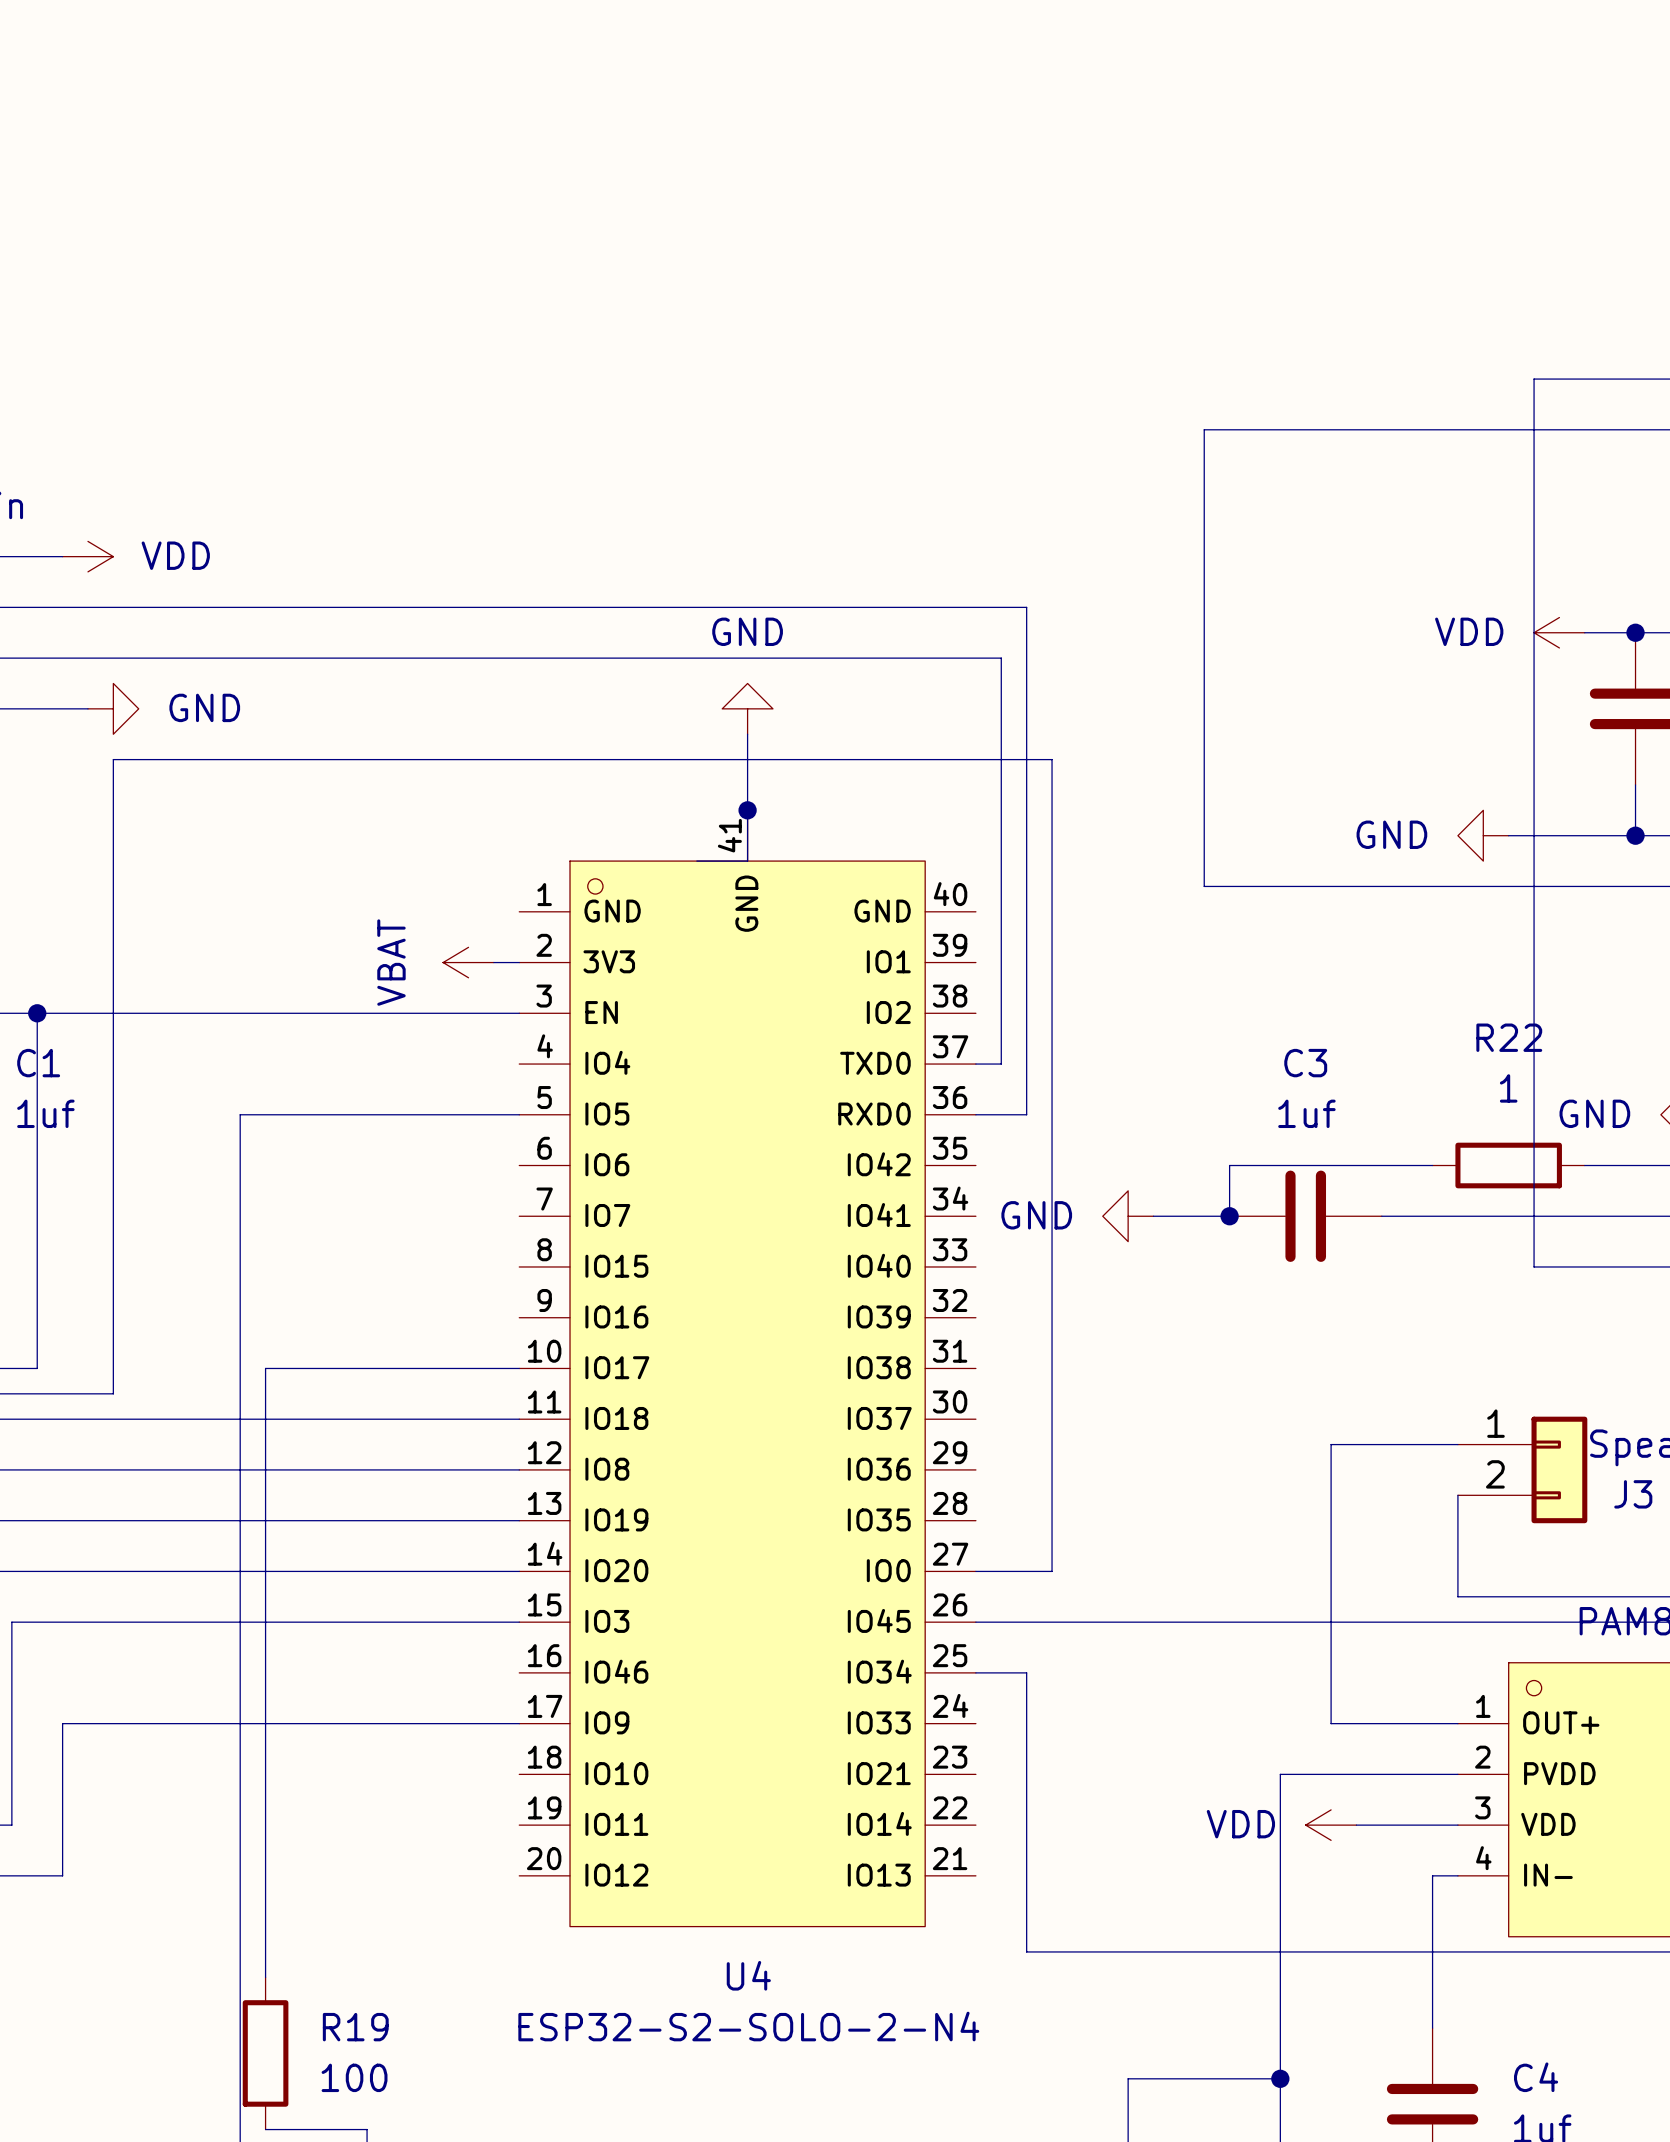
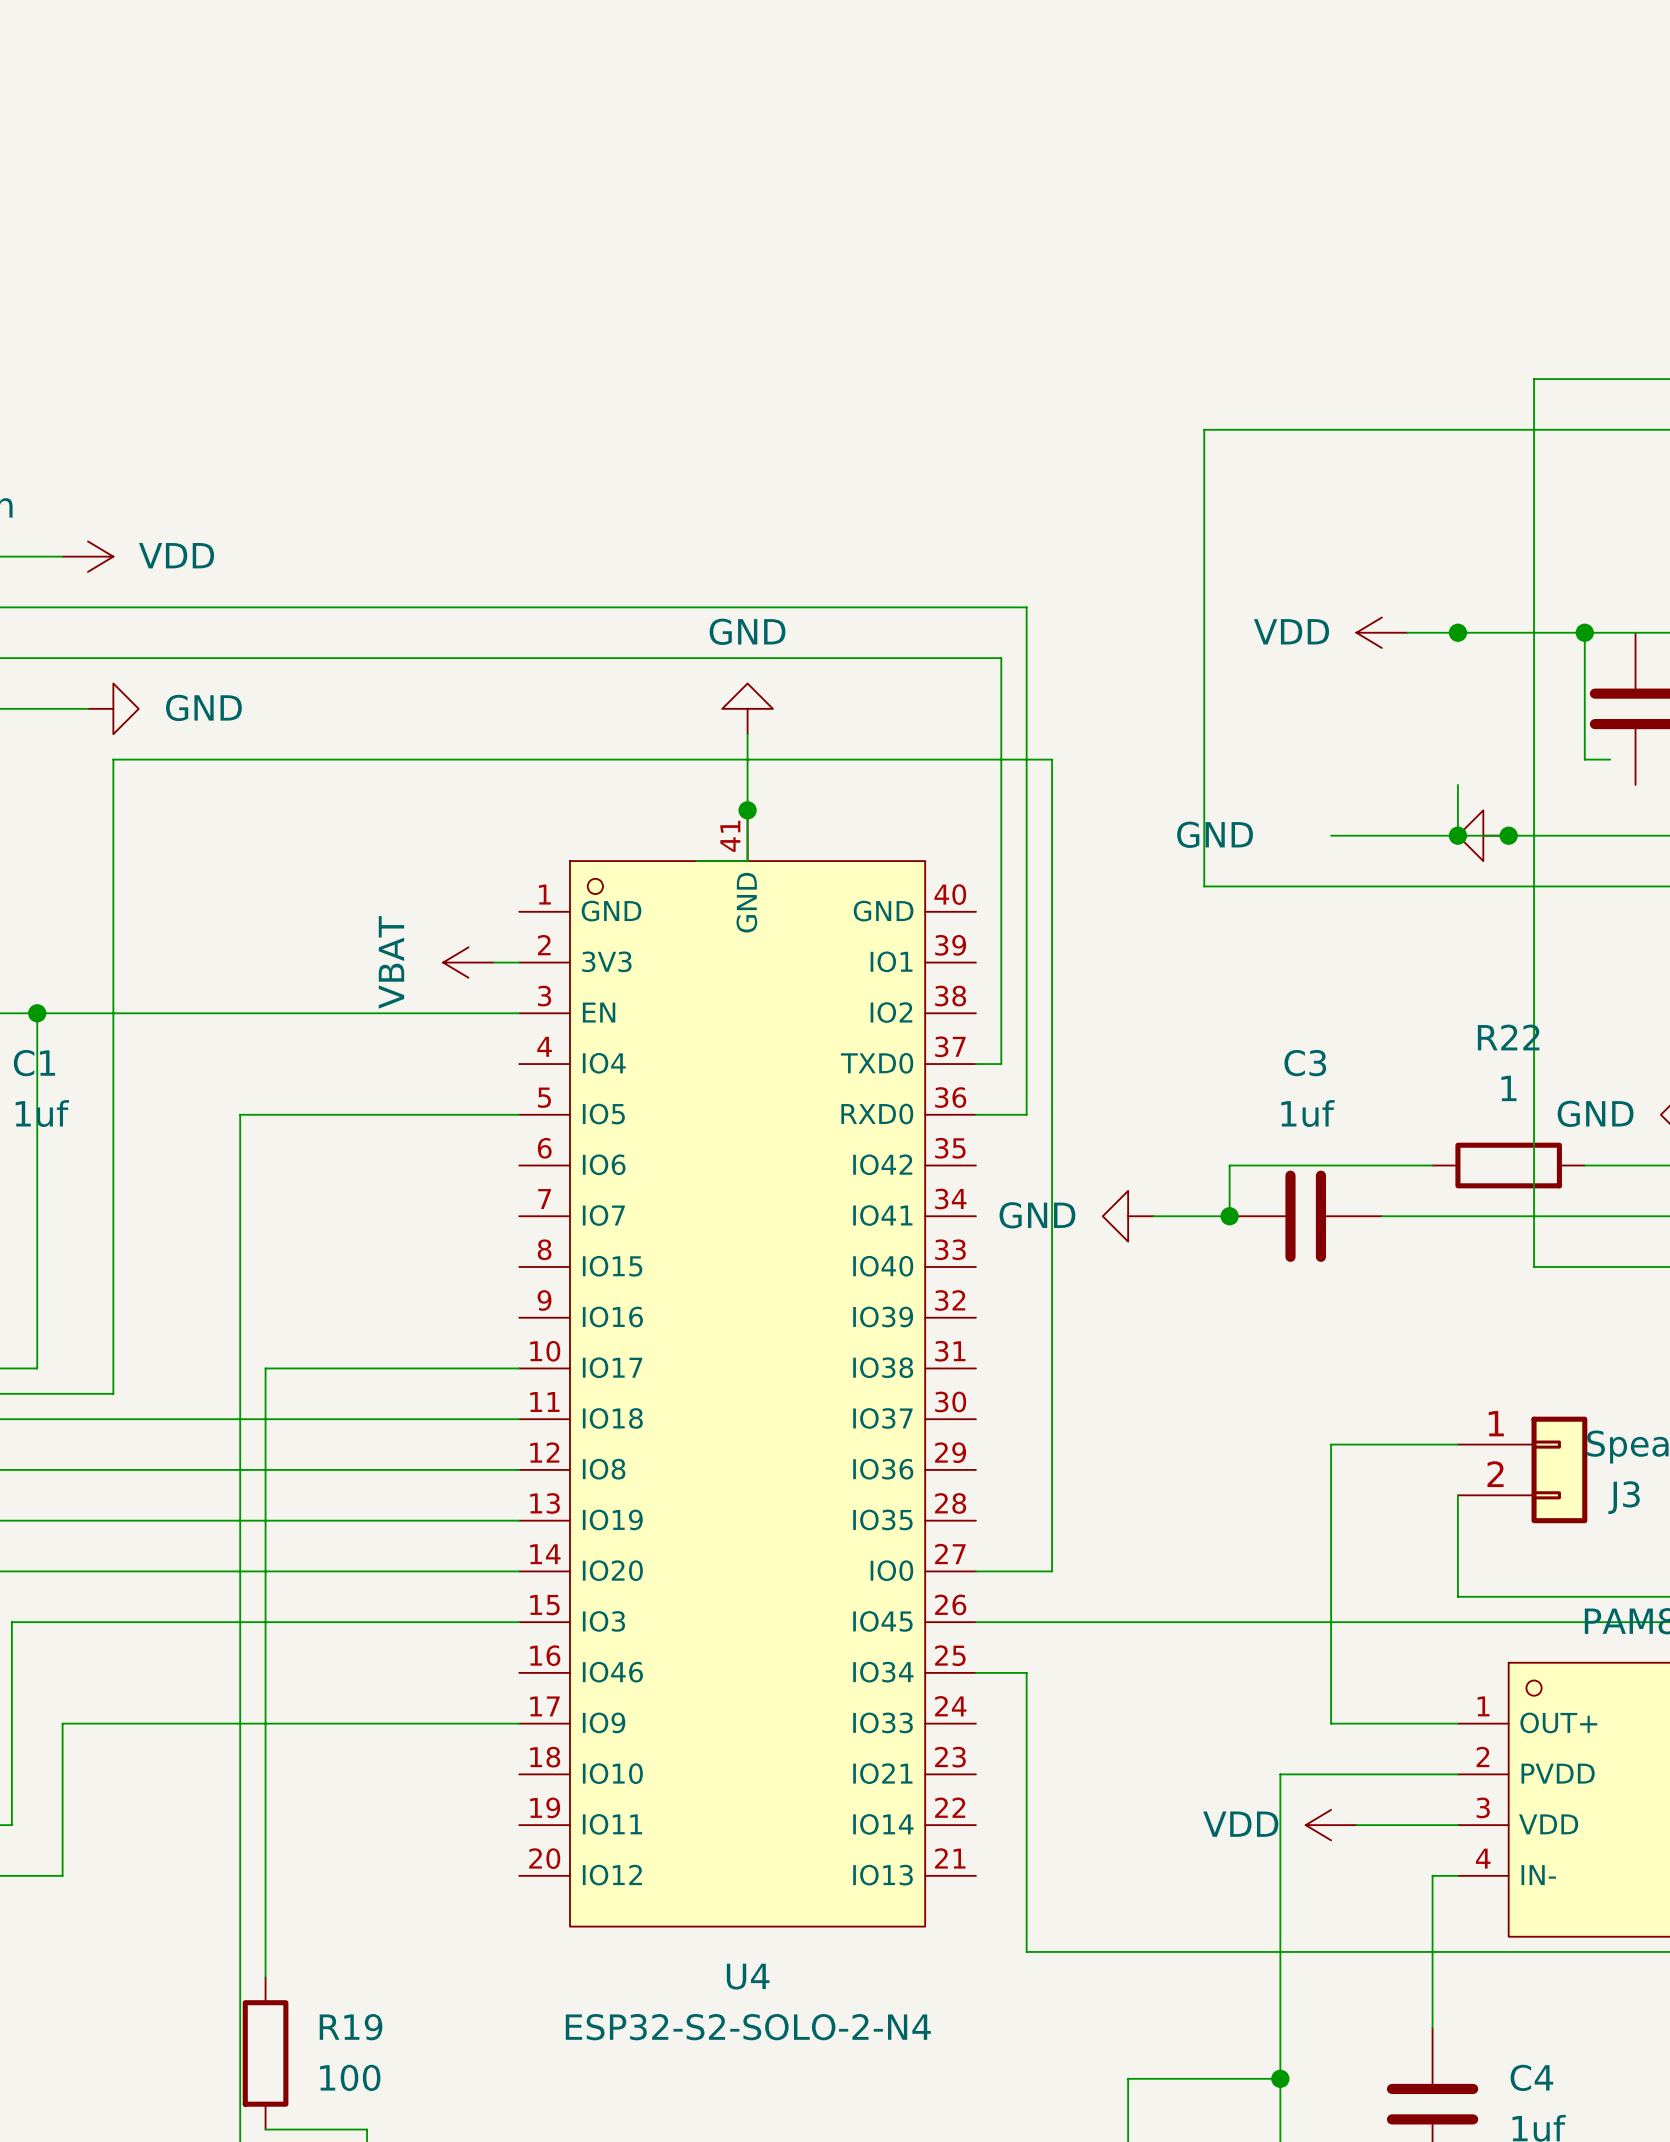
wire: none -> (1407, 632) (1584, 632) (1584, 759) (1610, 759)
junction: none -> (1457, 632)
power symbol position: VDD (1559, 632) -> VDD (1381, 632)
junction position: (1635, 632) -> (1584, 632)
wire: (1635, 784) (1635, 835) -> (1457, 784) (1457, 835)
power symbol text position: GND (1391, 834) -> GND (1215, 834)
wire: none -> (1331, 835) (1508, 835)
junction: none -> (1457, 835)
junction: none -> (1508, 835)
junction: (1635, 835) -> none

